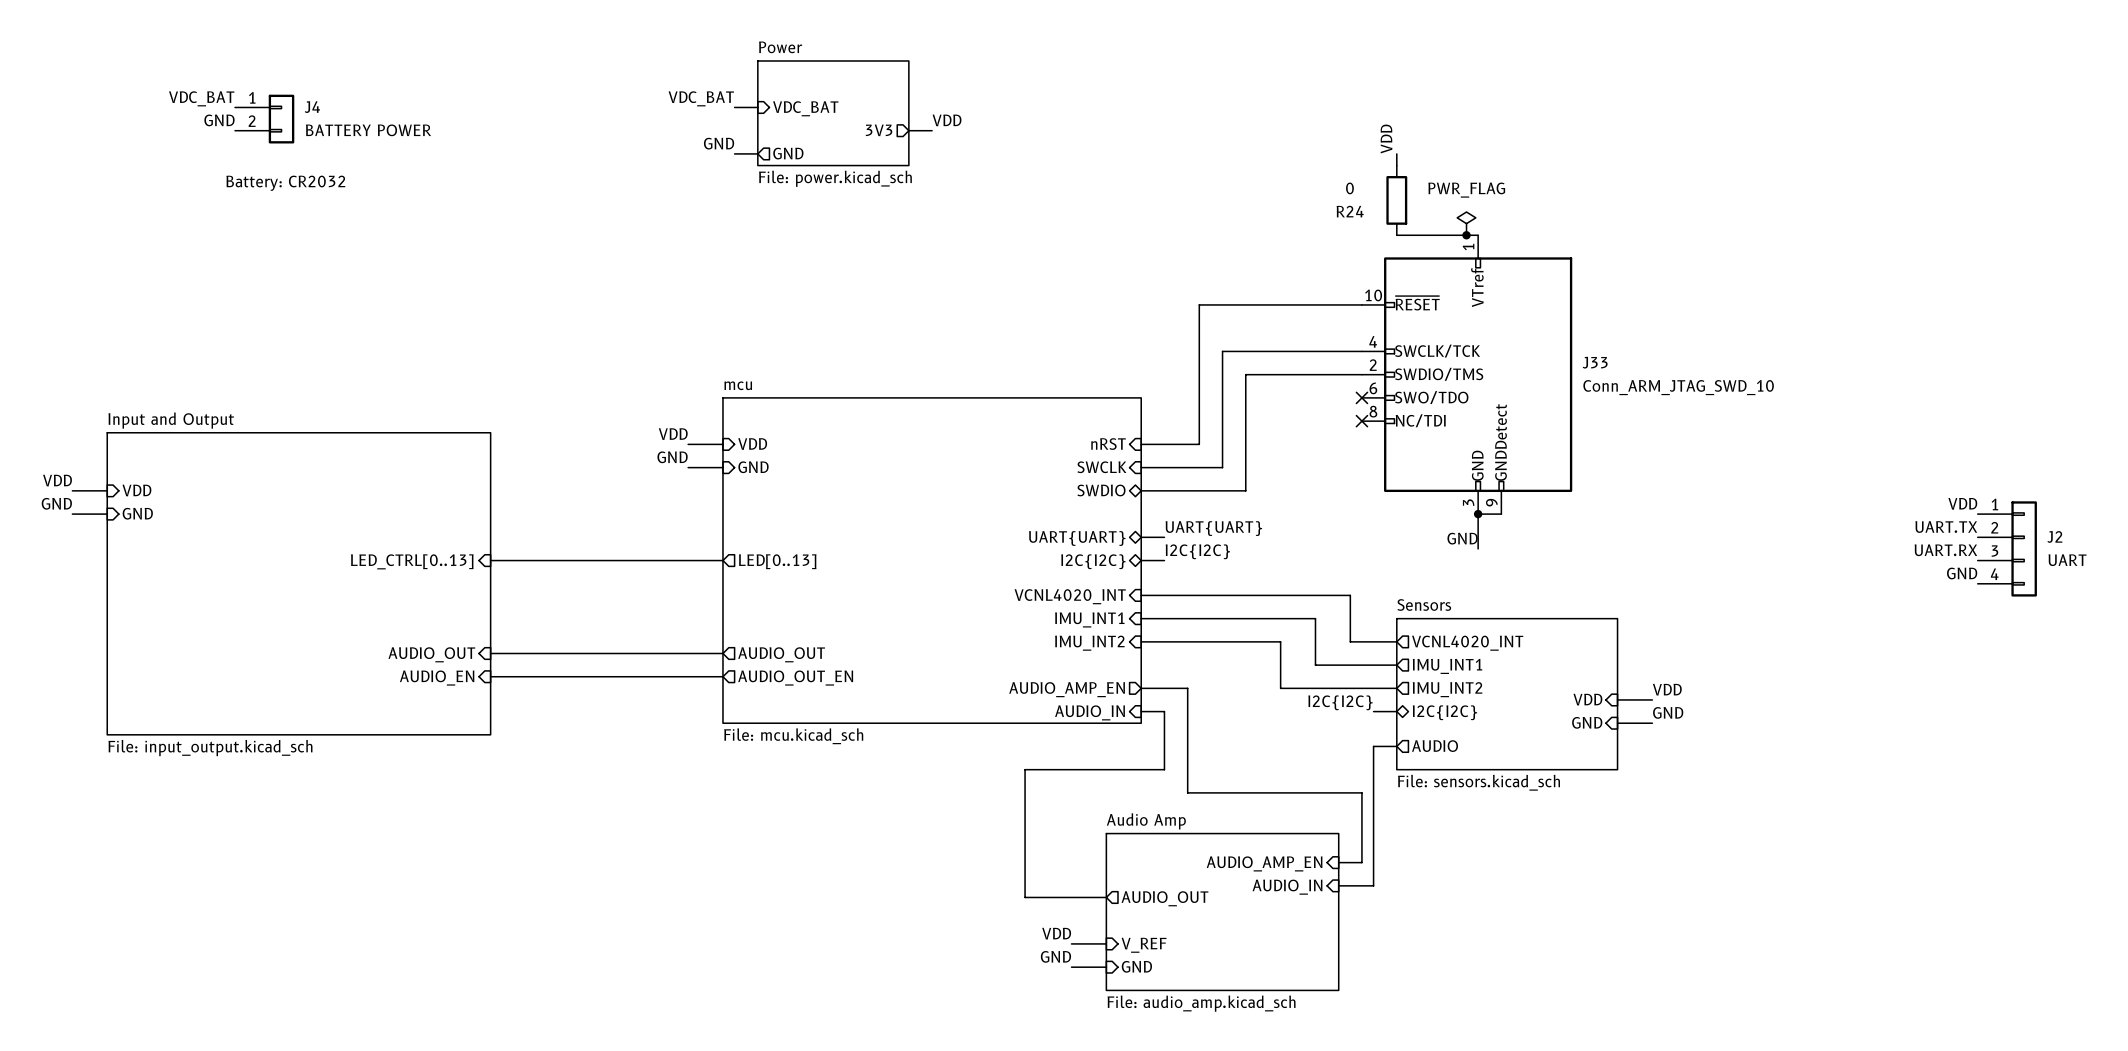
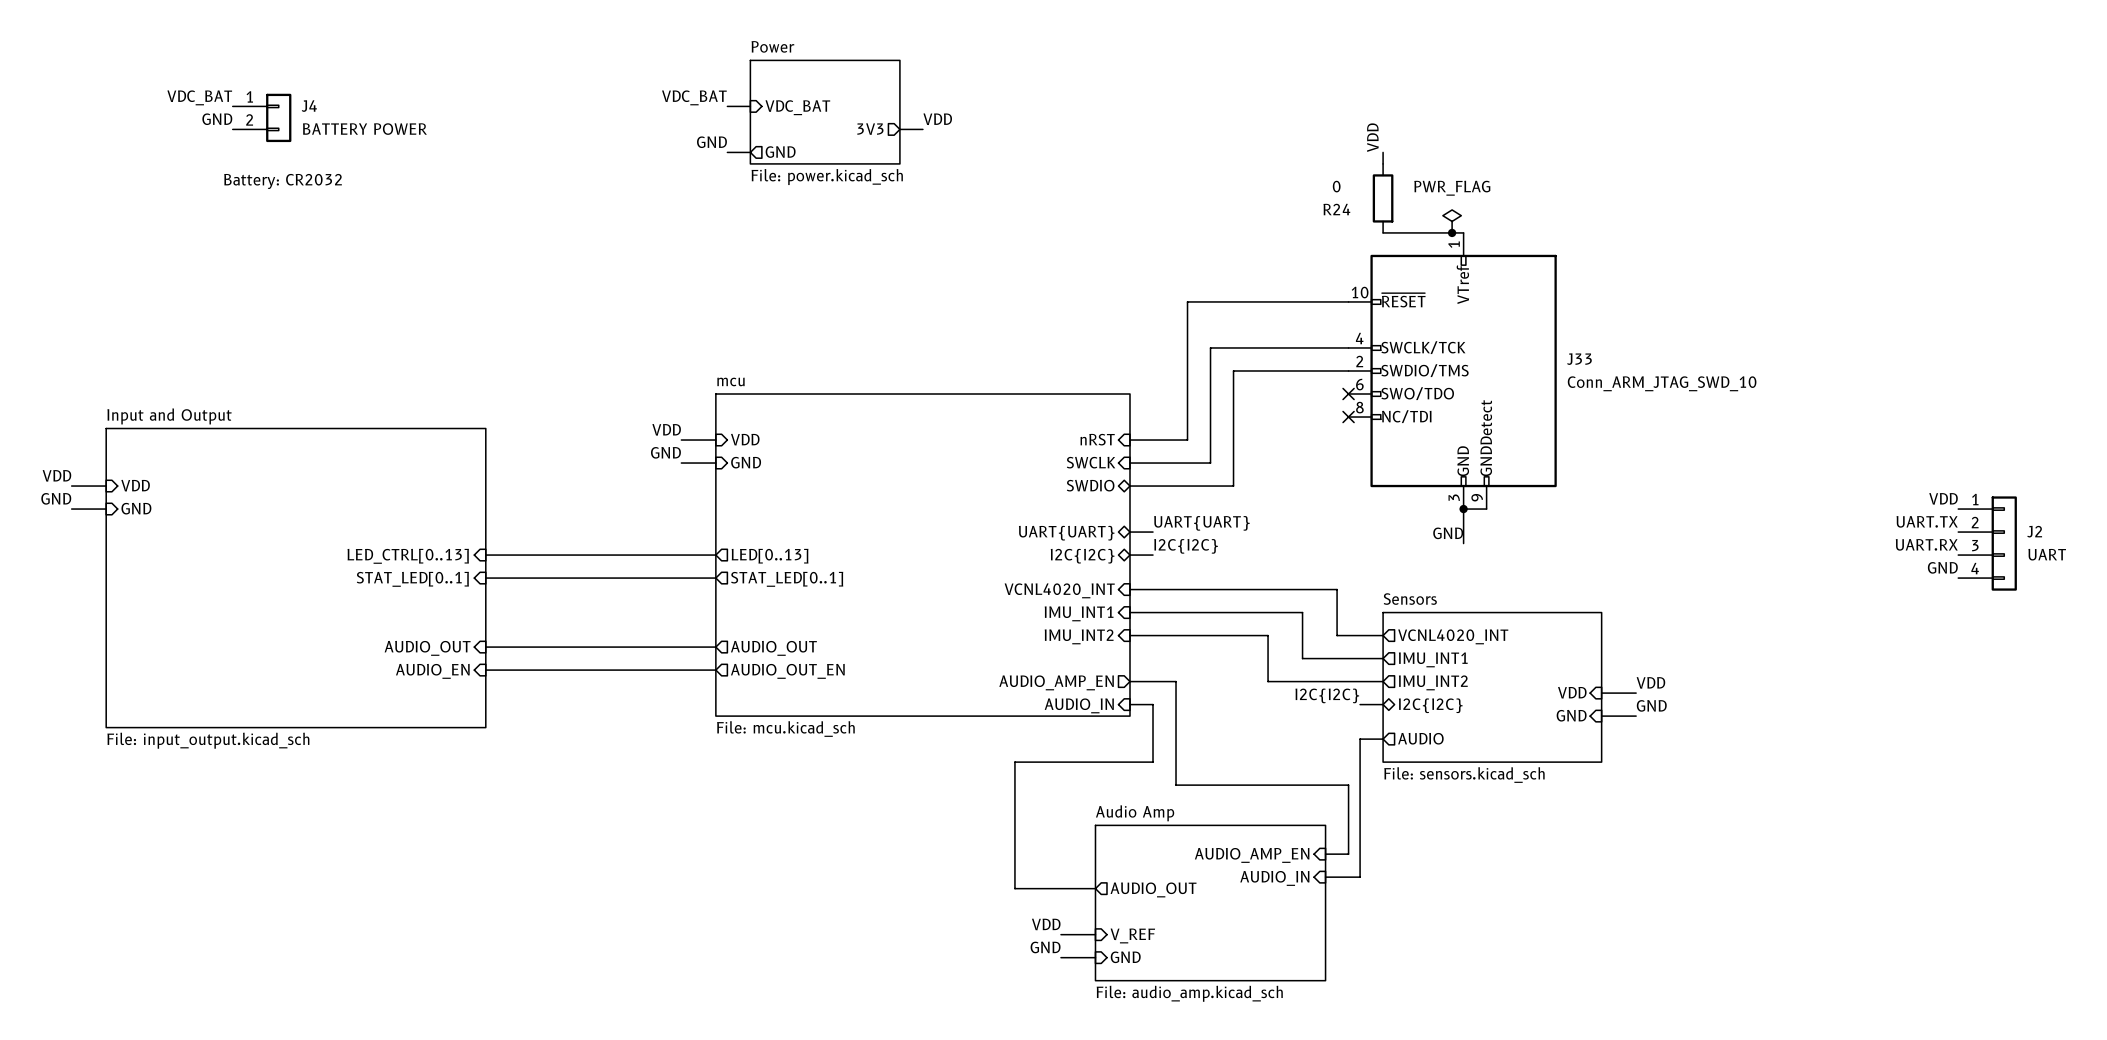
bus: none -> (485, 578) (715, 578)
sheet pin: none -> STAT_LED[0..1] (412, 579)
sheet pin: none -> STAT_LED[0..1] (787, 579)

